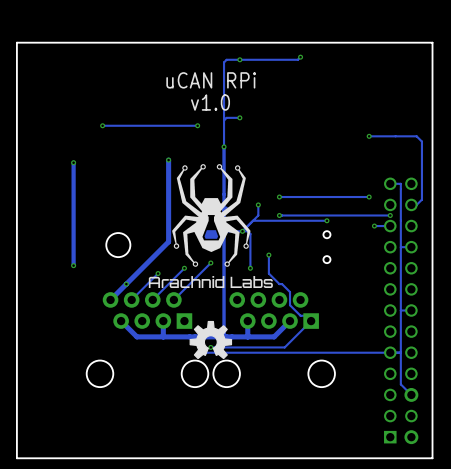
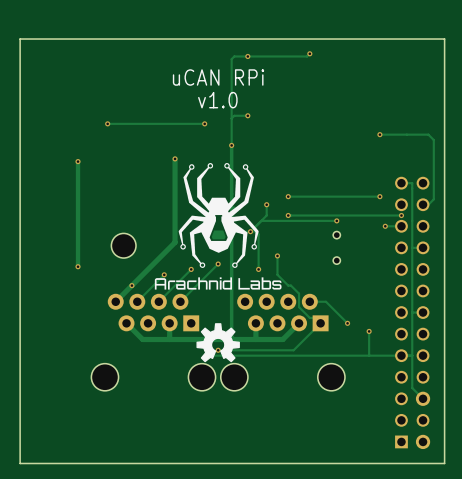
track: none -> (309, 301) (326, 301) (347, 323)
via: none -> (347, 323)
track: none -> (369, 331) (369, 355)
via: none -> (369, 331)

